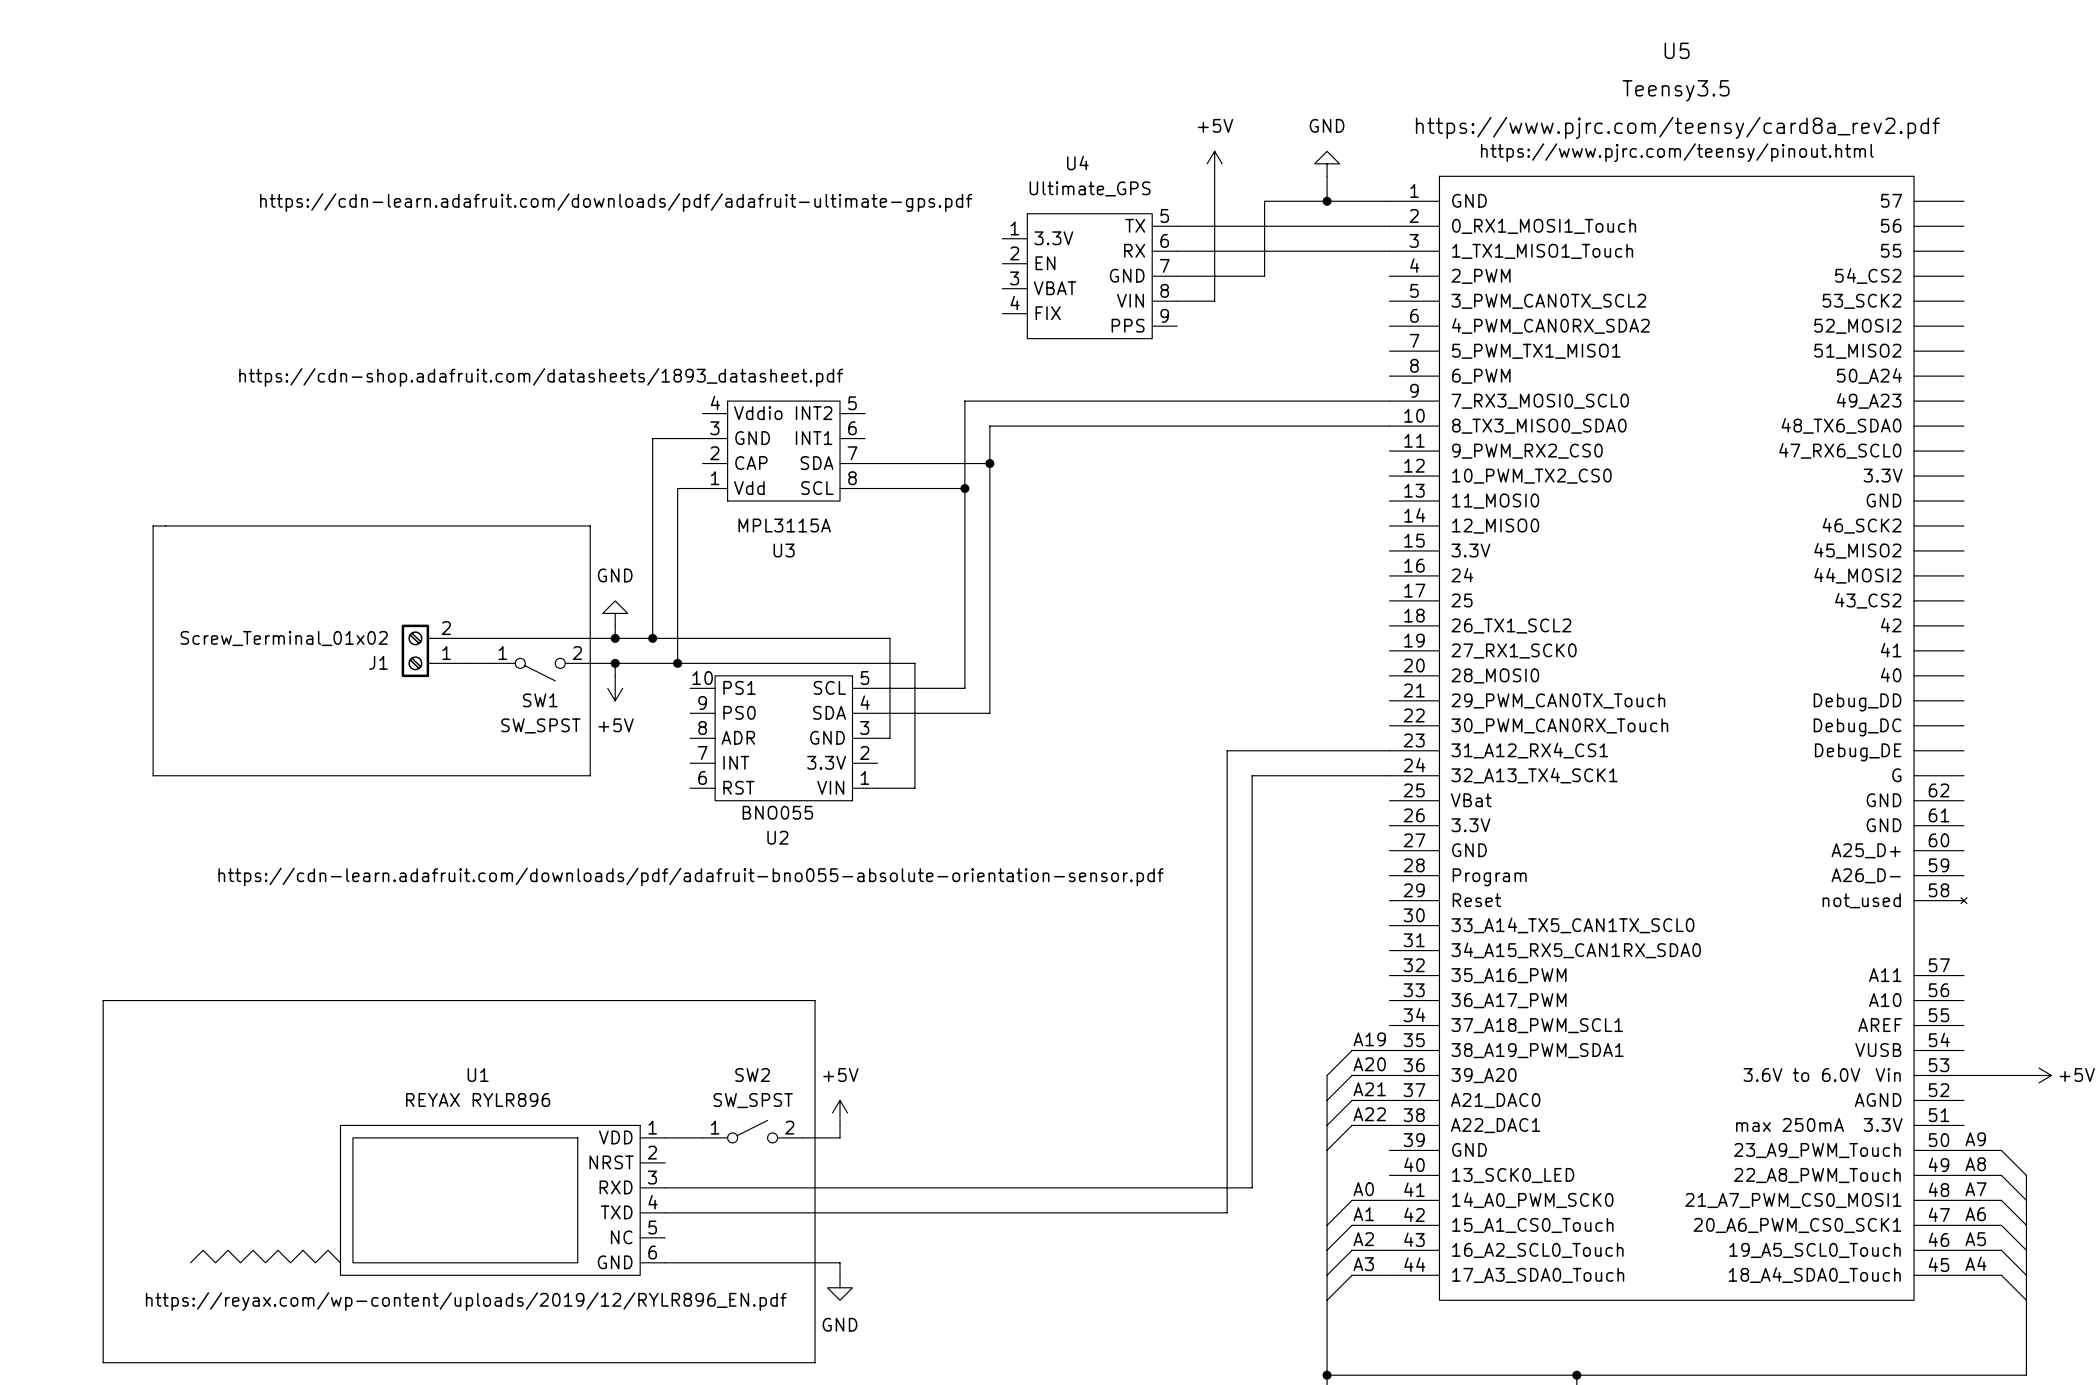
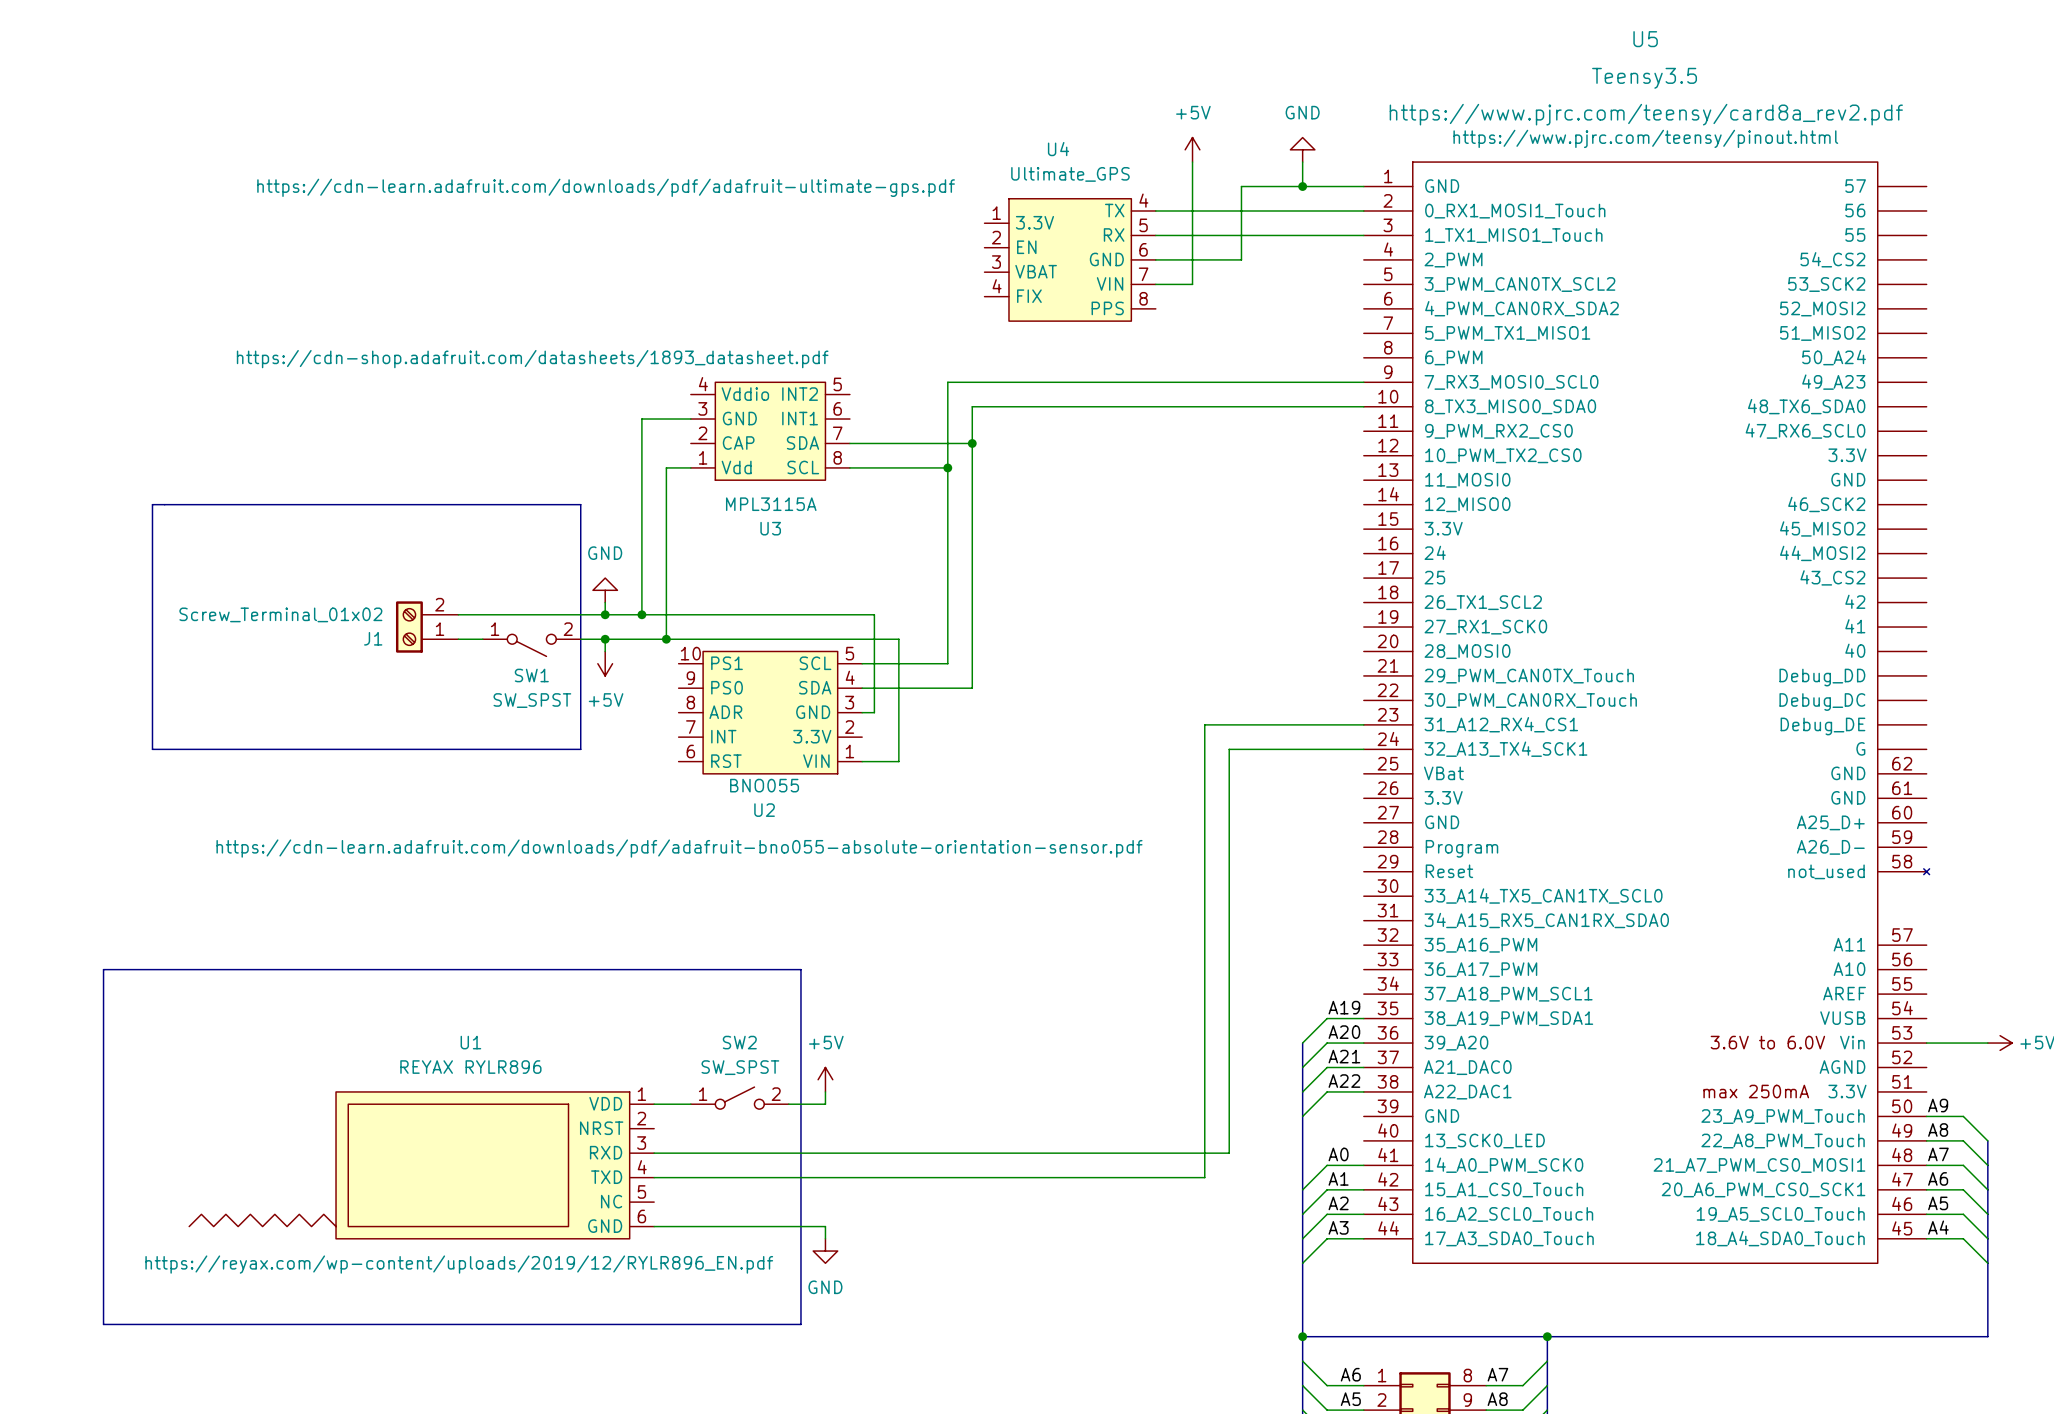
U4 pin number: 5 (1164, 215) -> 4 (1143, 200)
U4 pin number: 6 (1164, 240) -> 5 (1143, 225)
U4 pin number: 7 (1164, 265) -> 6 (1143, 249)
U4 pin number: 8 (1164, 290) -> 7 (1143, 274)
U4 pin number: 9 (1164, 315) -> 8 (1143, 298)

